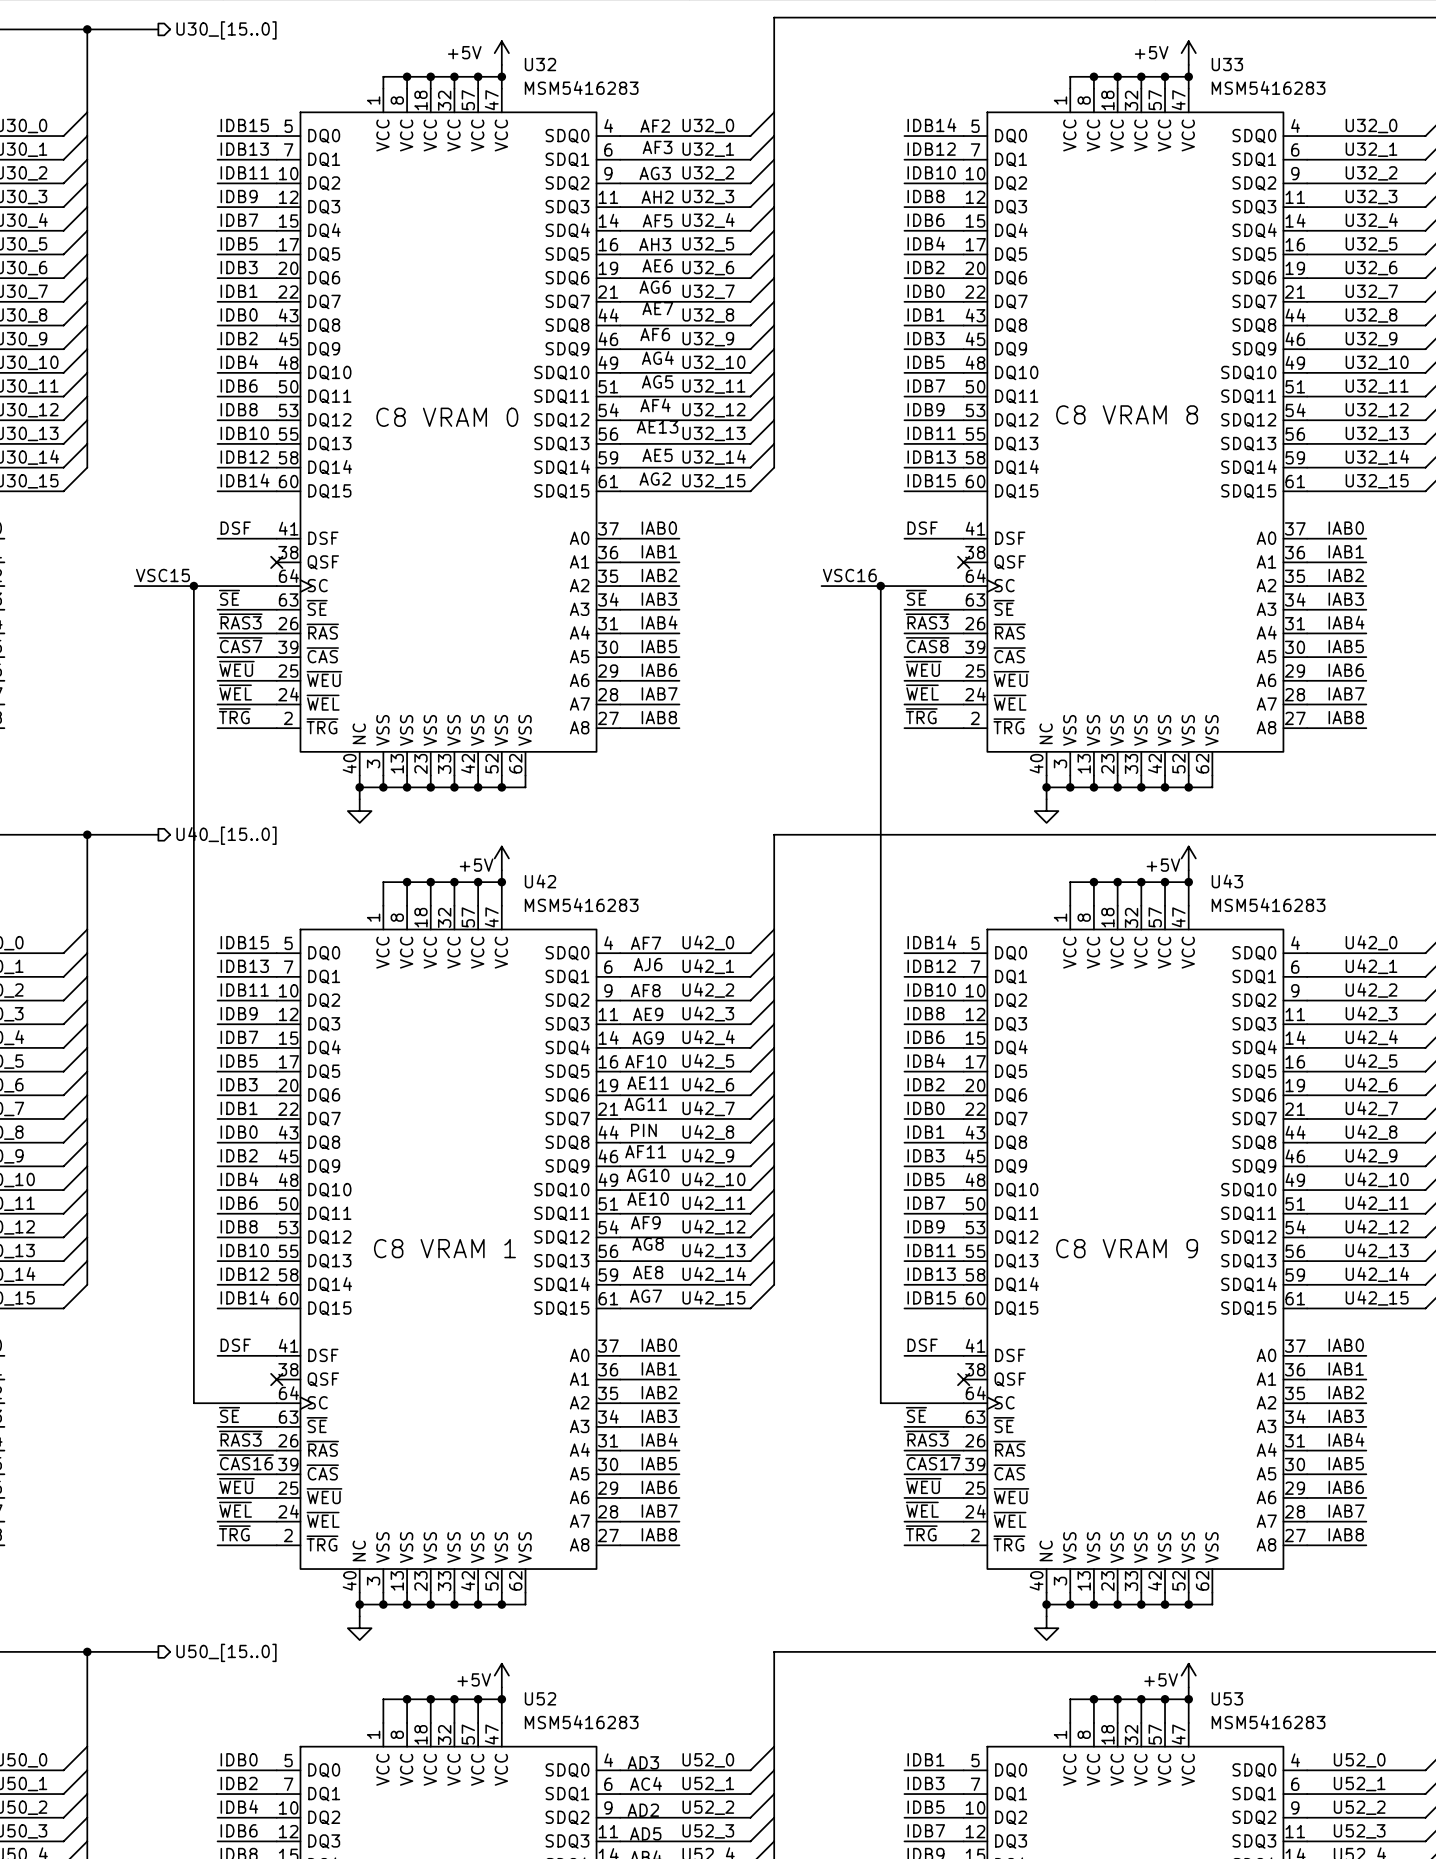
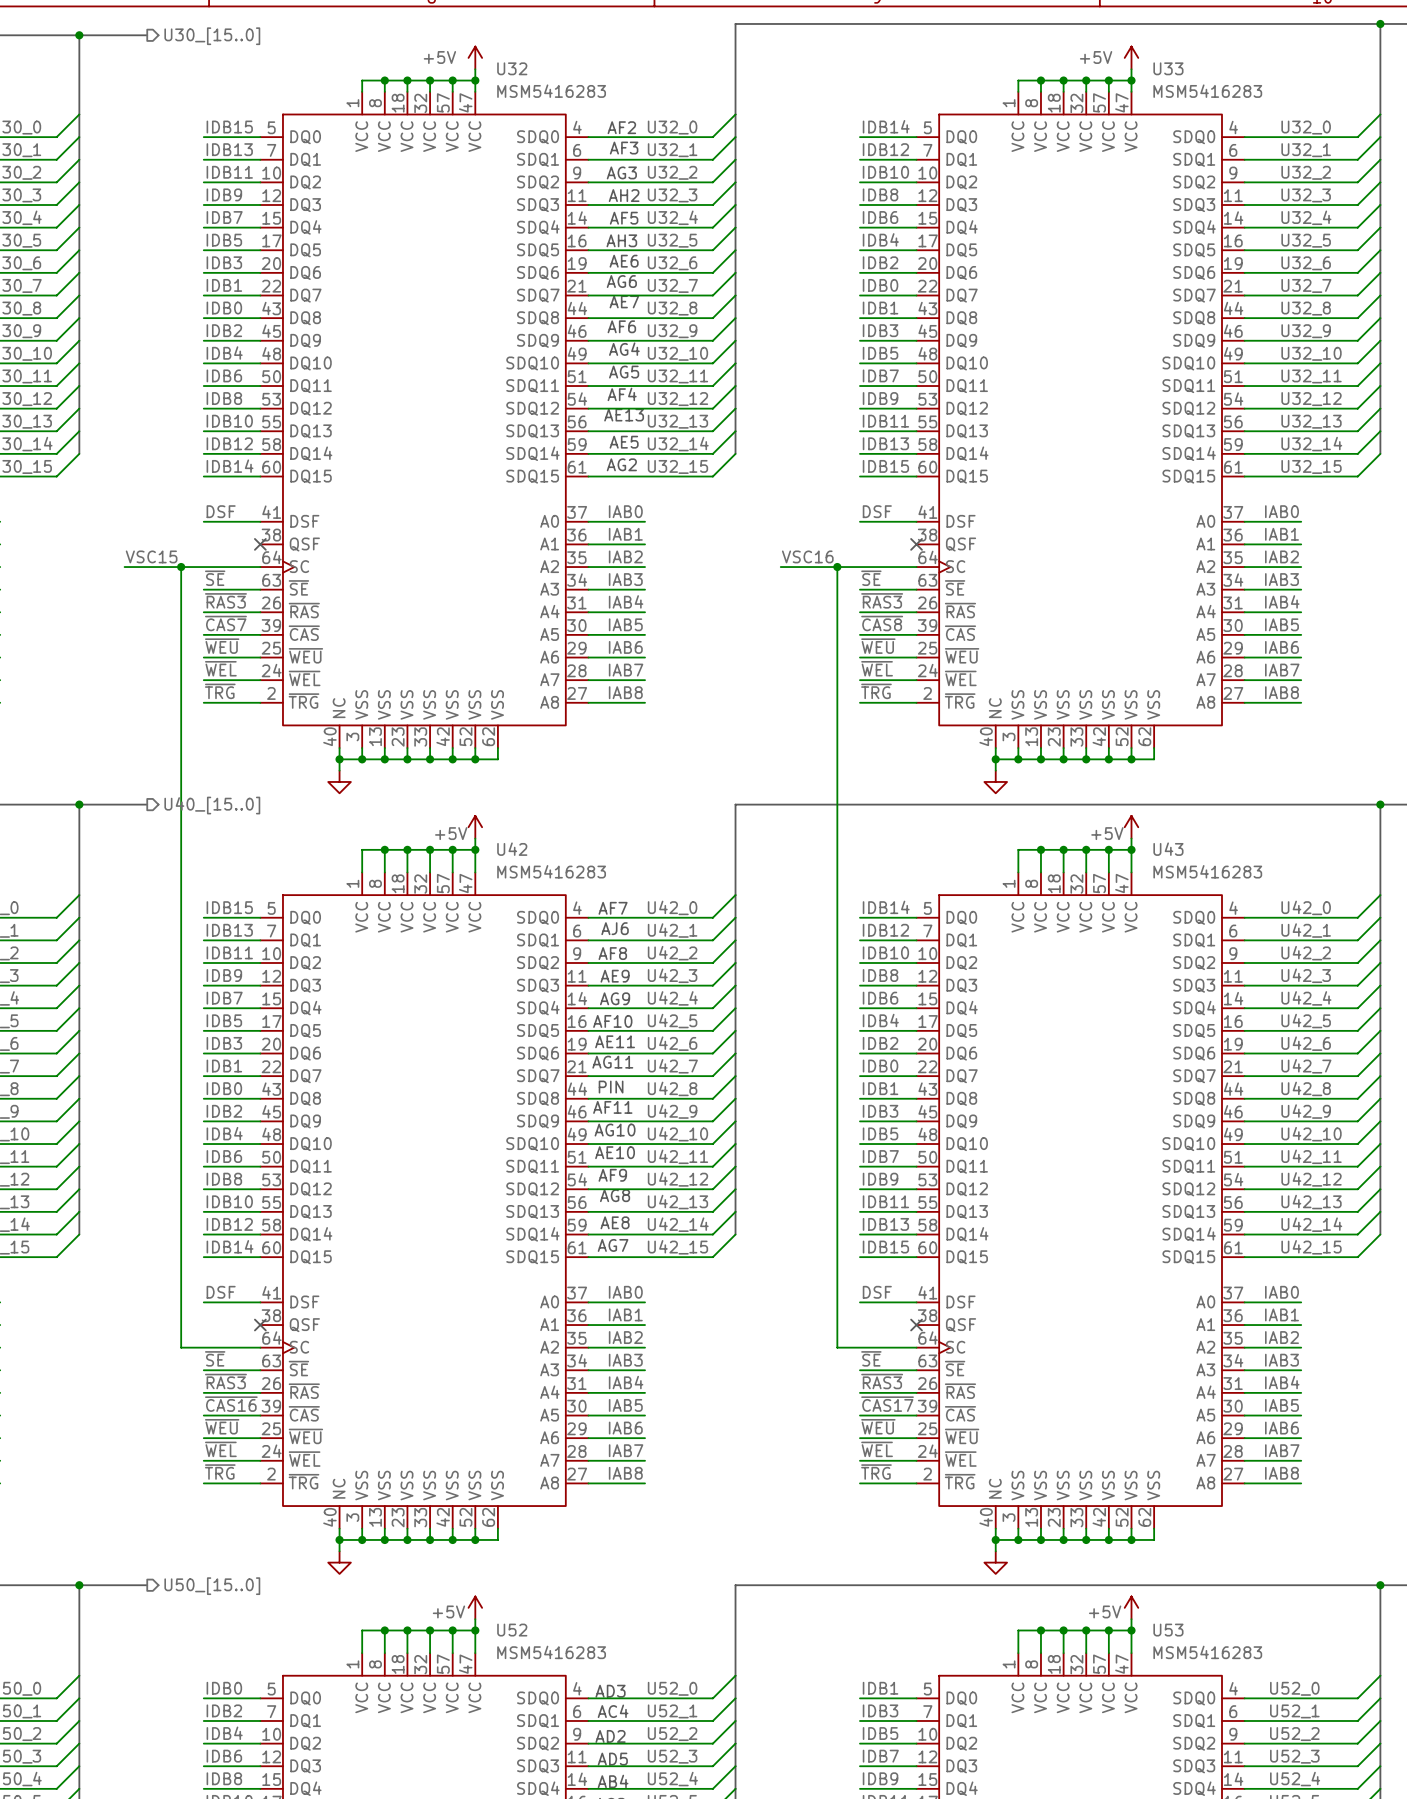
text: C8 VRAM 8 (1127, 414) -> none
text: C8 VRAM 0 (447, 417) -> none
text: C8 VRAM 1 (444, 1248) -> none
text: C8 VRAM 9 (1127, 1248) -> none

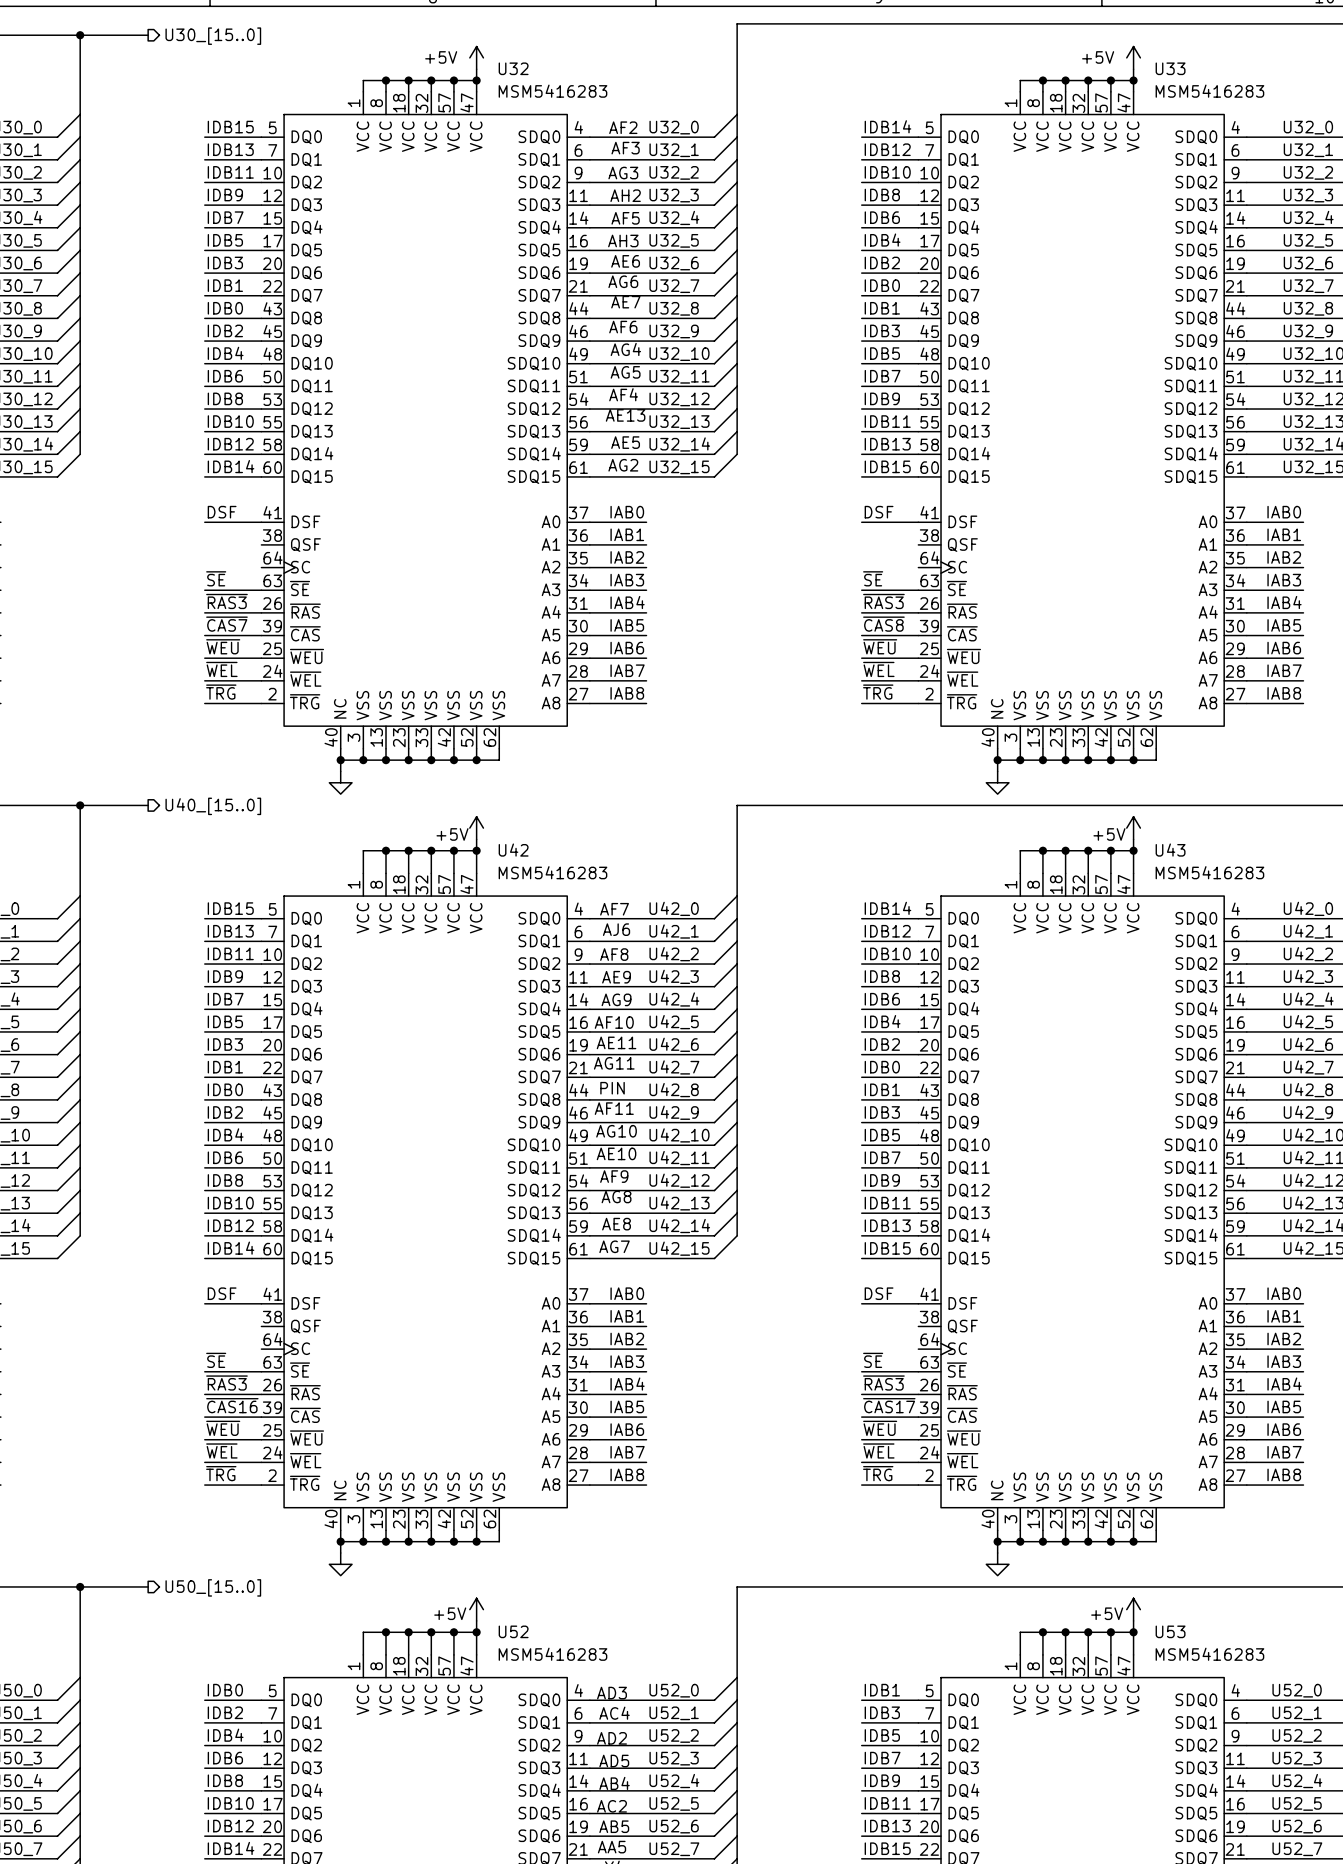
no-connect mark: (260, 544) -> none
no-connect mark: (916, 544) -> none
label: VSC15 (151, 556) -> none
label: VSC16 (807, 556) -> none
wire: (124, 567) (260, 567) -> none
wire: (181, 567) (181, 1347) (260, 1347) -> none
junction: (181, 567) -> none
wire: (780, 567) (916, 567) -> none
wire: (837, 567) (837, 1347) (916, 1347) -> none
junction: (837, 567) -> none
no-connect mark: (260, 1325) -> none
no-connect mark: (916, 1325) -> none

